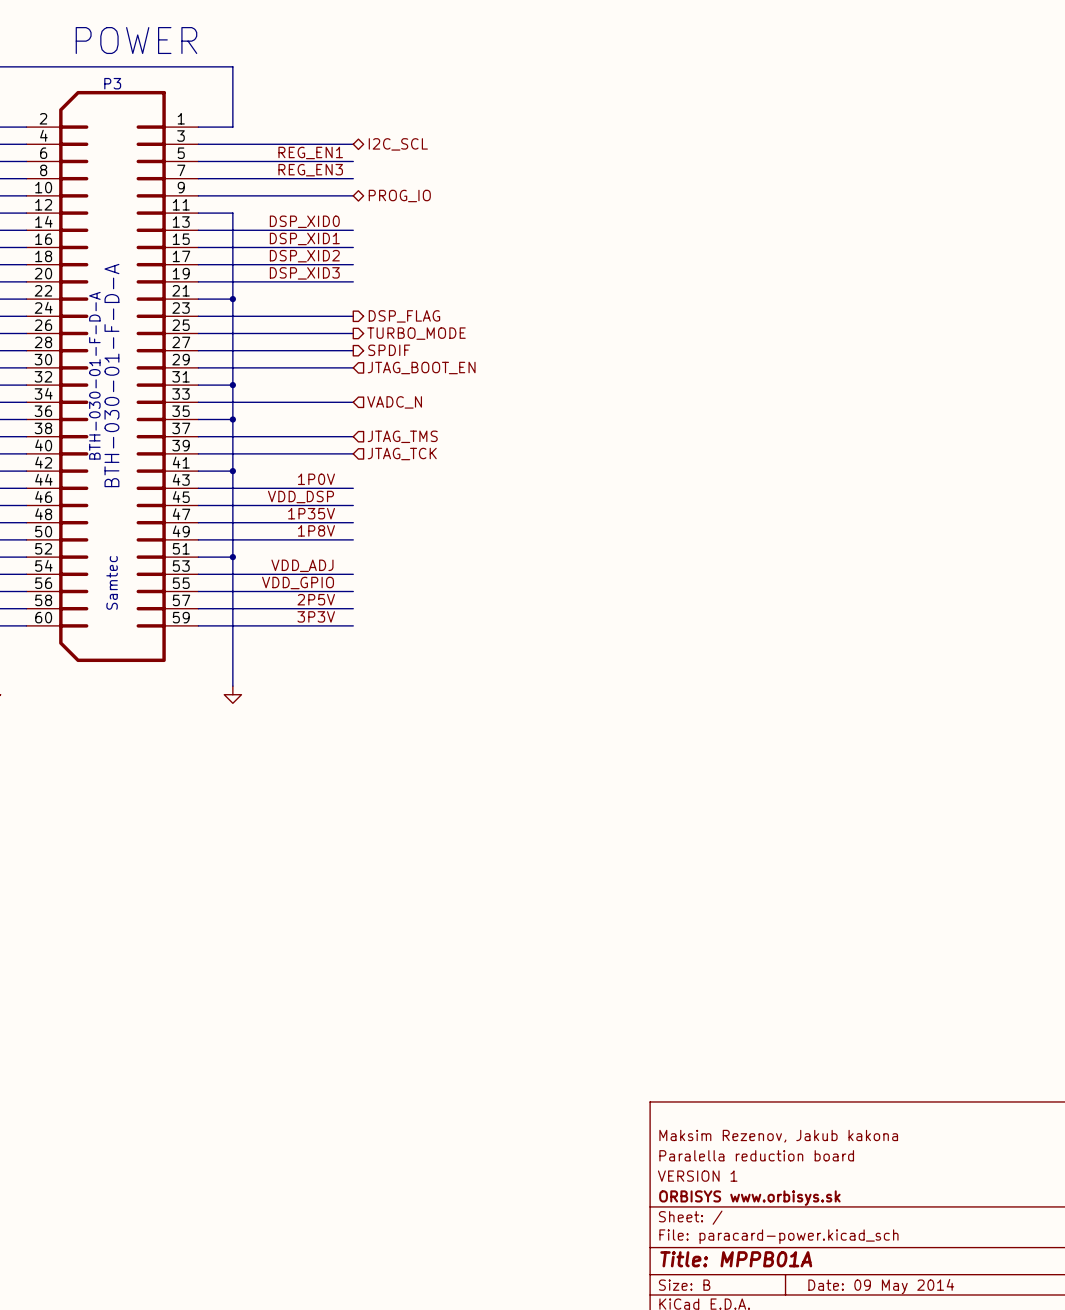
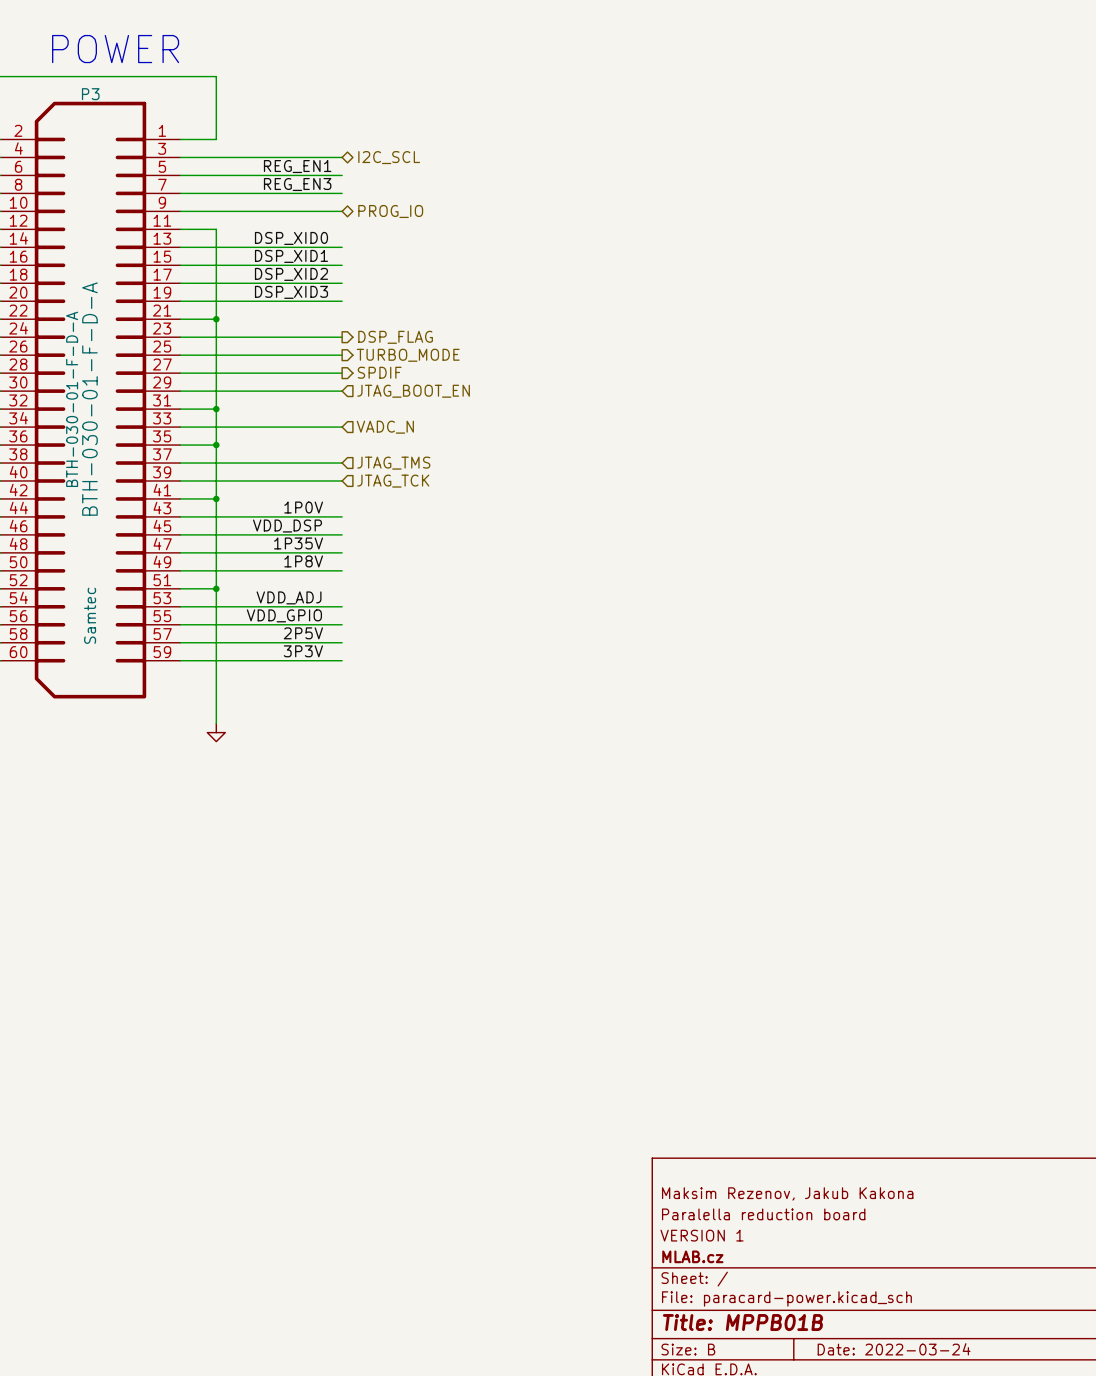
title block: Maksim Rezenov, Jakub kakona (778, 1136) -> Maksim Rezenov, Jakub Kakona (787, 1193)
title block: ORBISYS www.orbisys.sk (749, 1198) -> MLAB.cz (692, 1256)
title block: Title: MPPB01A (736, 1259) -> Title: MPPB01B (743, 1322)
title block: Date: 09 May 2014 (881, 1286) -> Date: 2022-03-24 (894, 1349)

